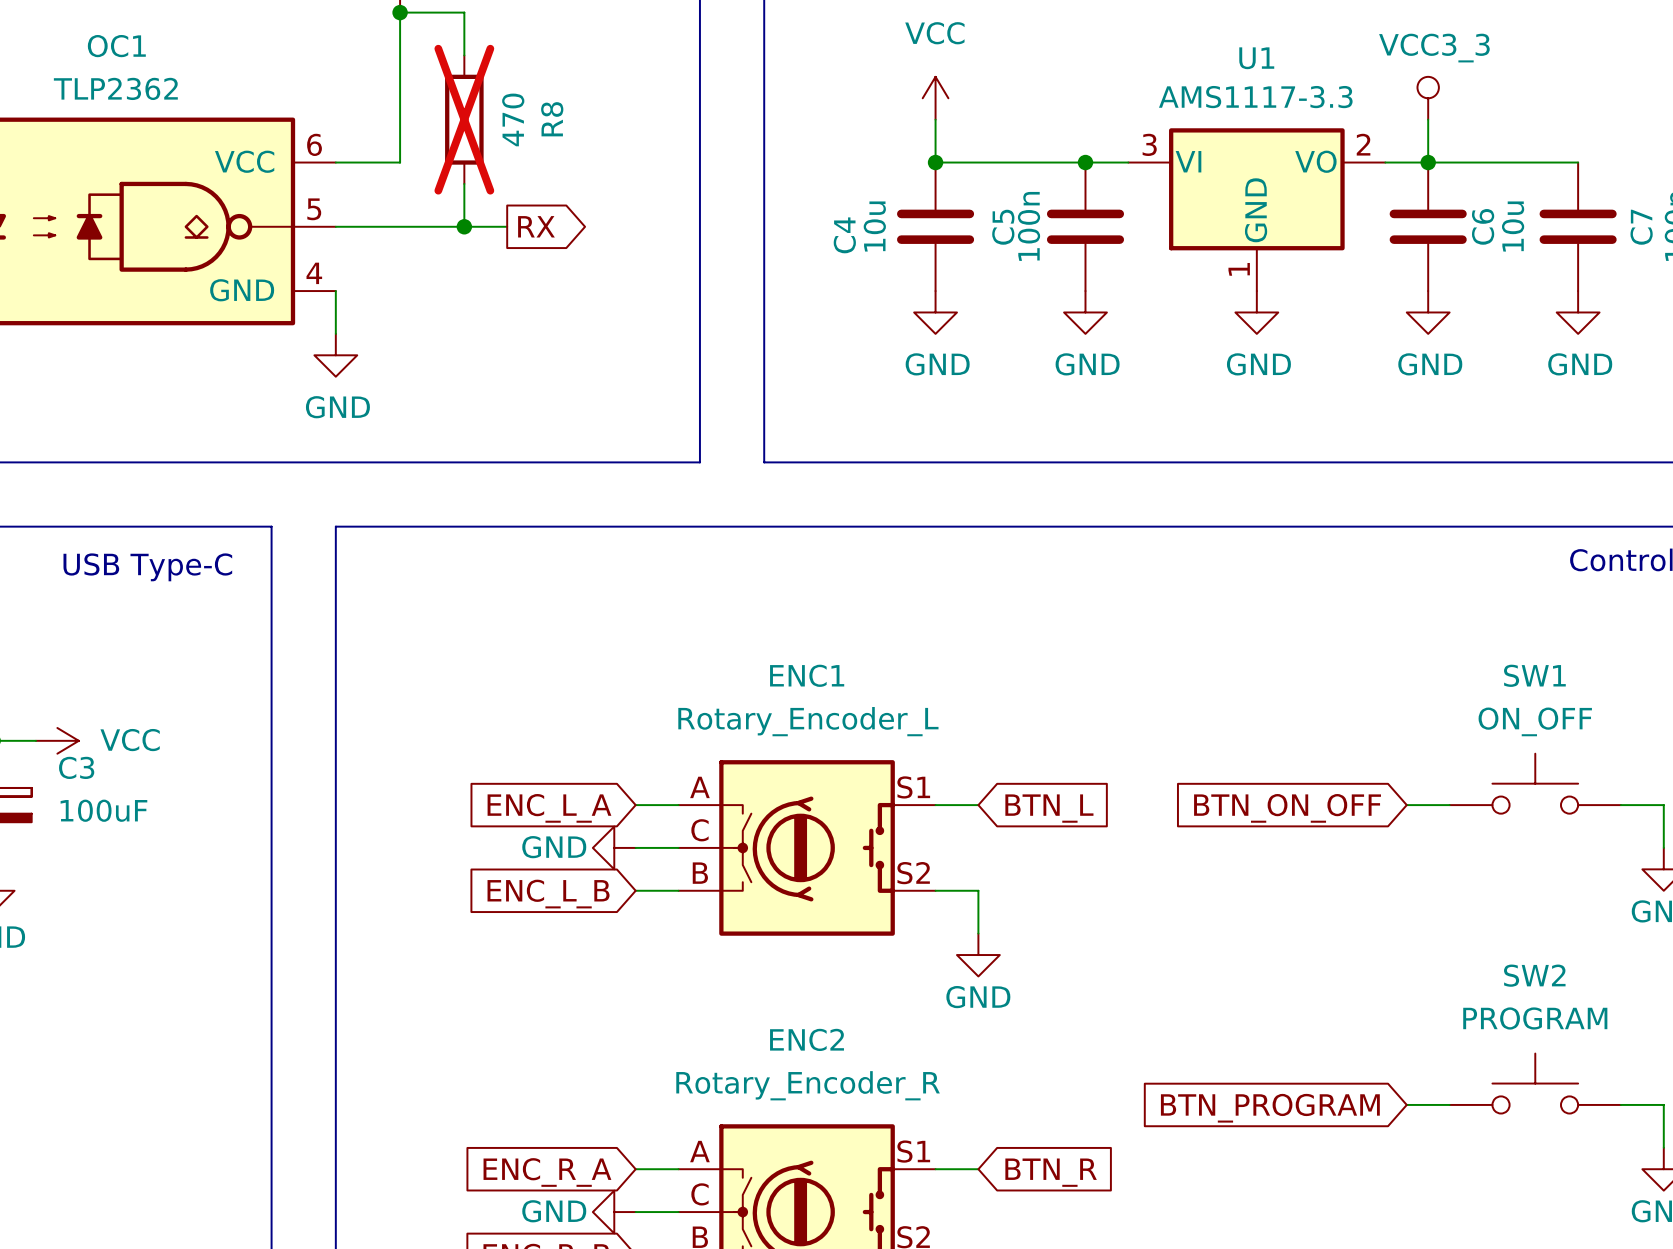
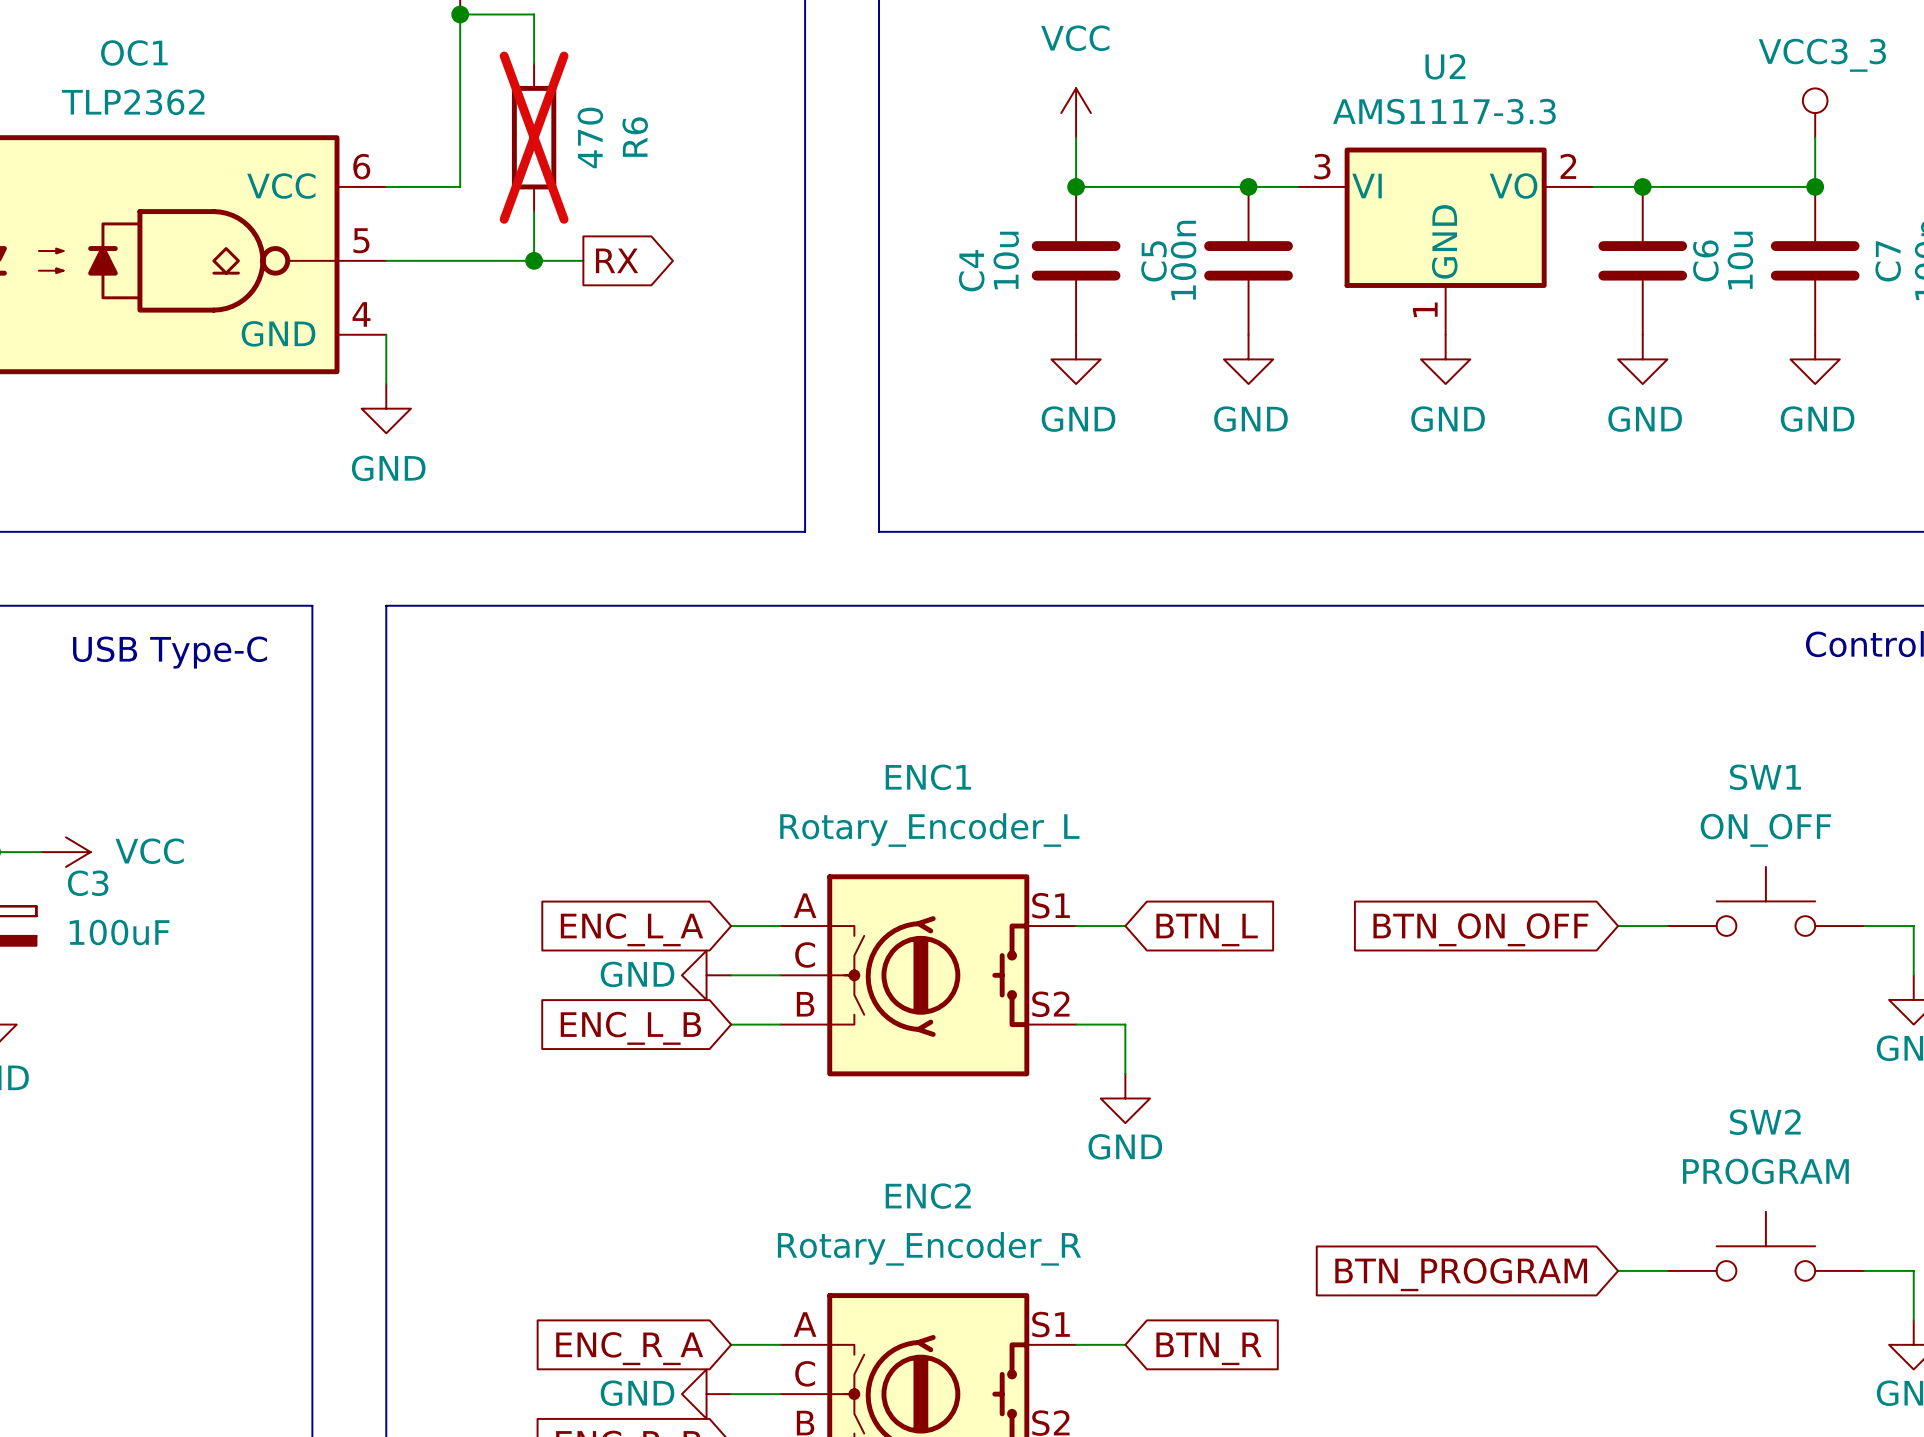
U1 name: U1 (1256, 58) -> U2 (1445, 66)
power symbol position: VCC3_3 (1428, 98) -> VCC3_3 (1815, 113)
R8 name: R8 (552, 119) -> R6 (635, 137)
wire: (1428, 119) (1428, 162) -> (1815, 137) (1815, 186)
junction: none -> (1815, 186)

